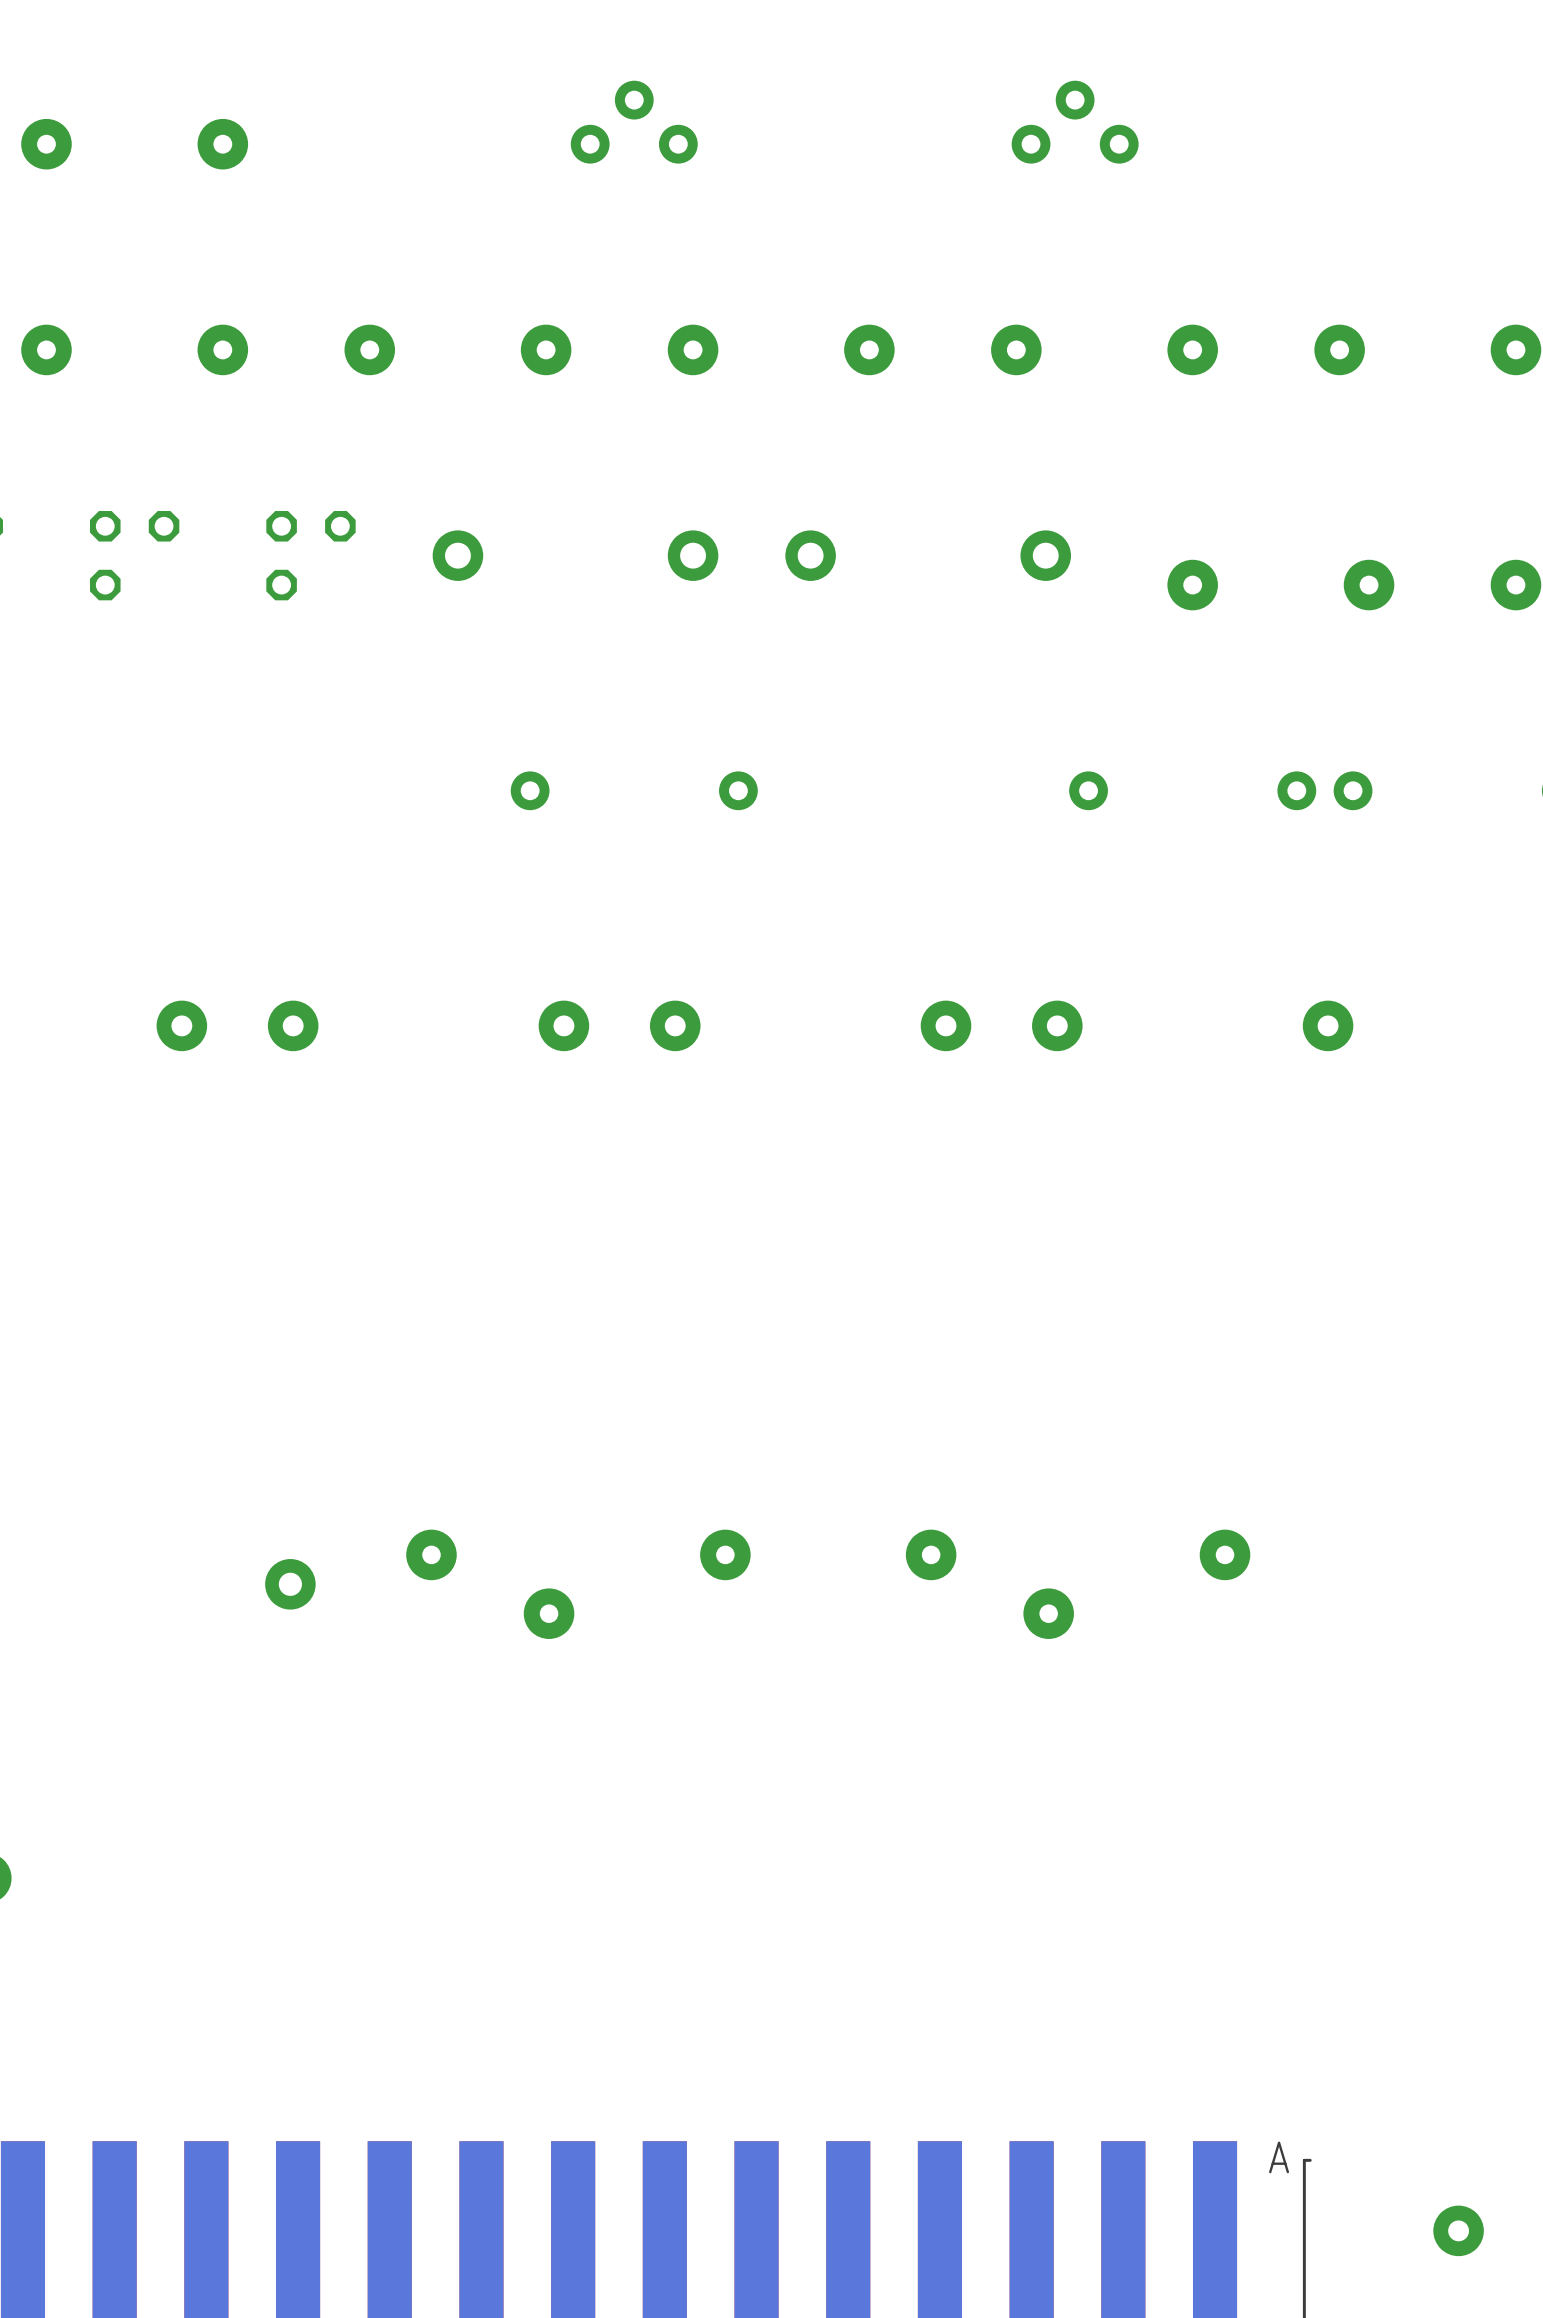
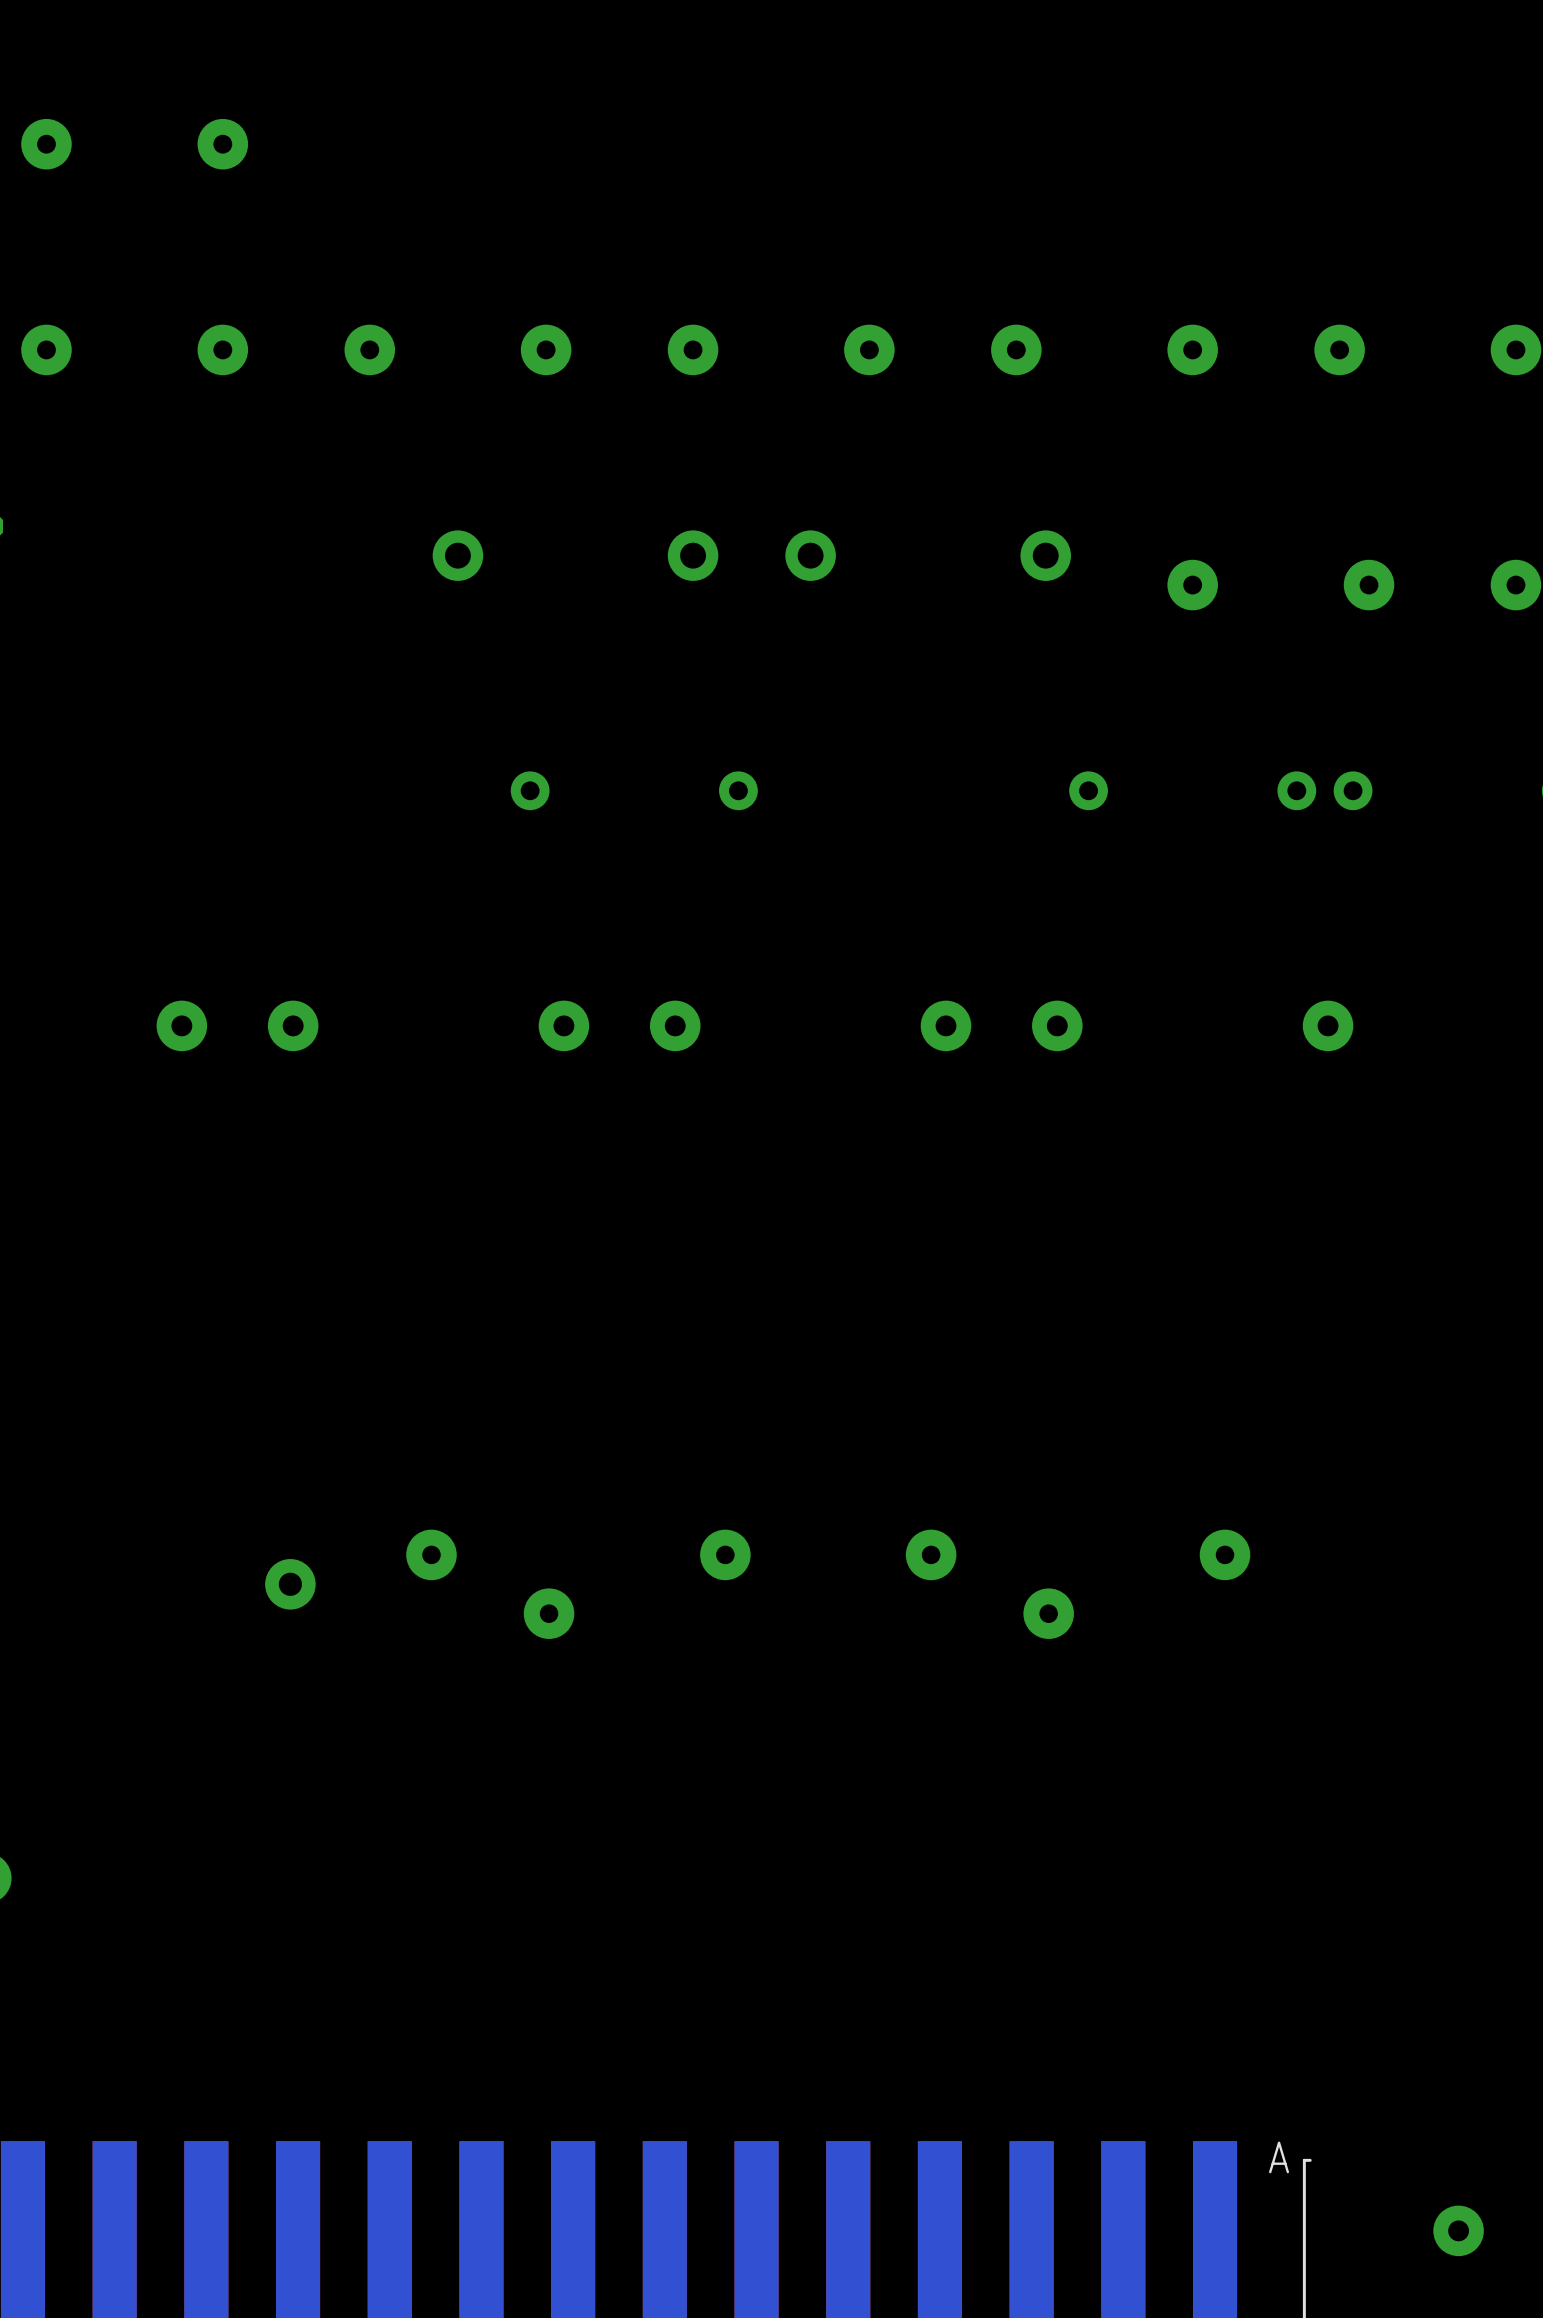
part: (634, 122) -> none
part: (1075, 122) -> none
part: (134, 555) -> none
part: (310, 555) -> none

